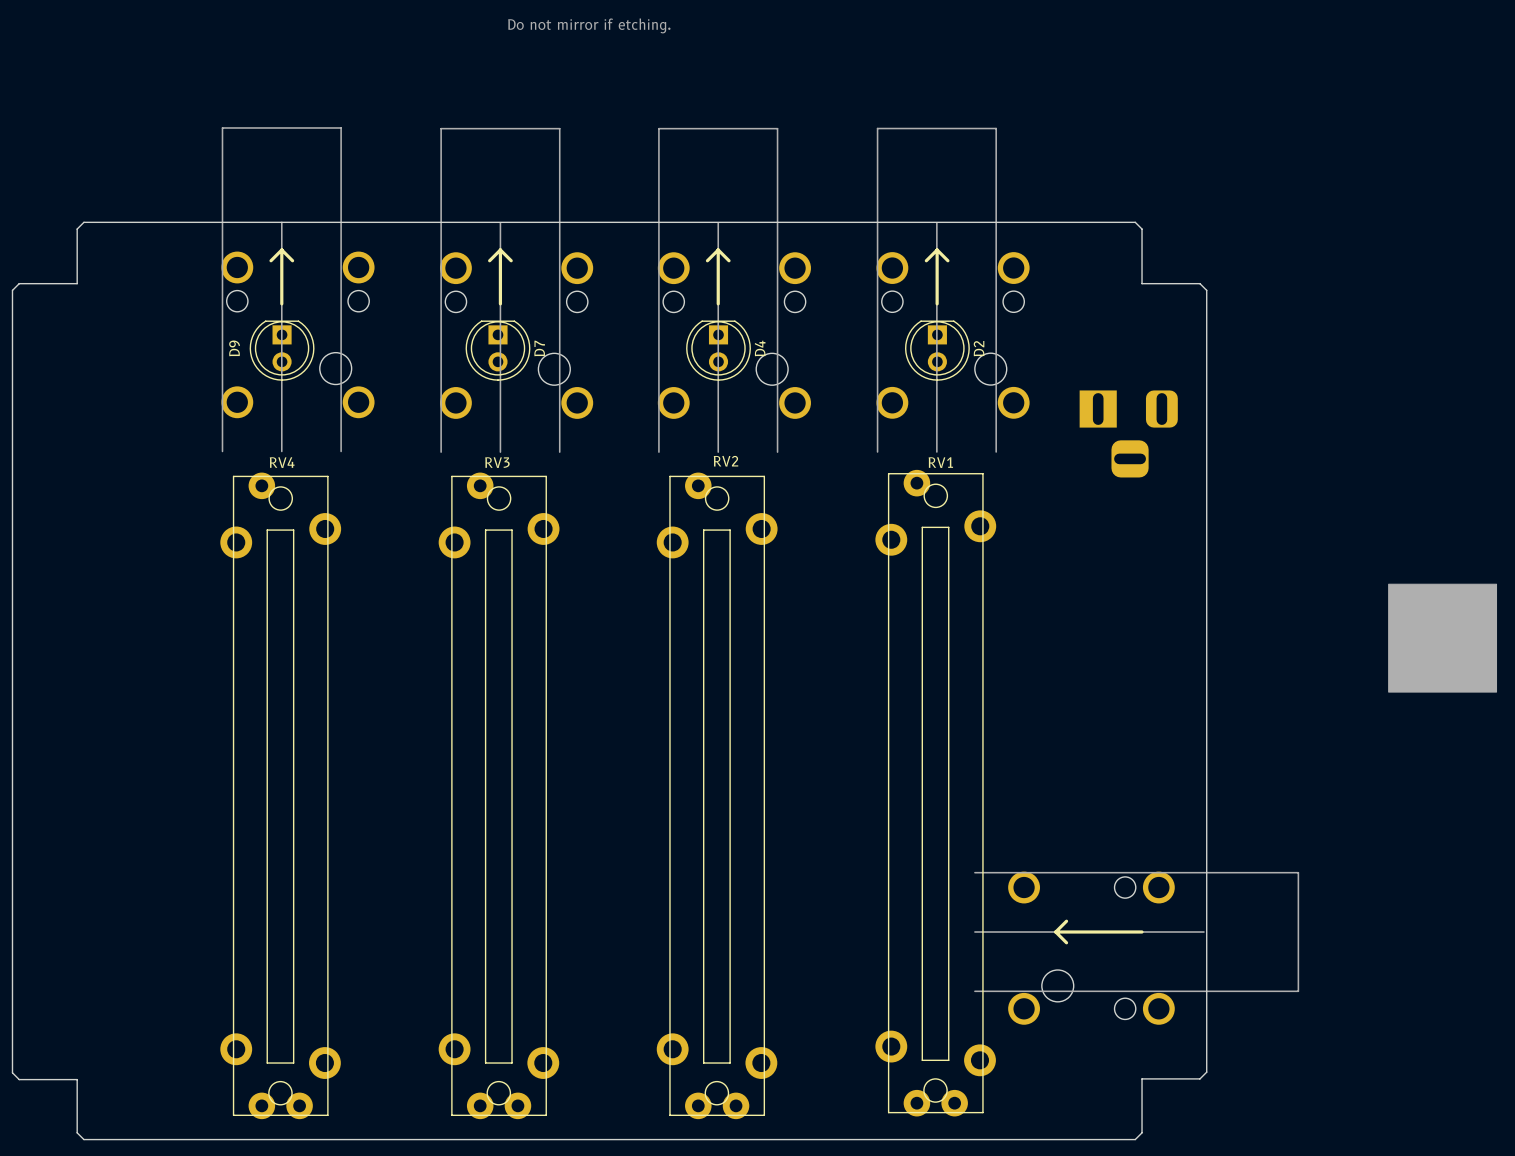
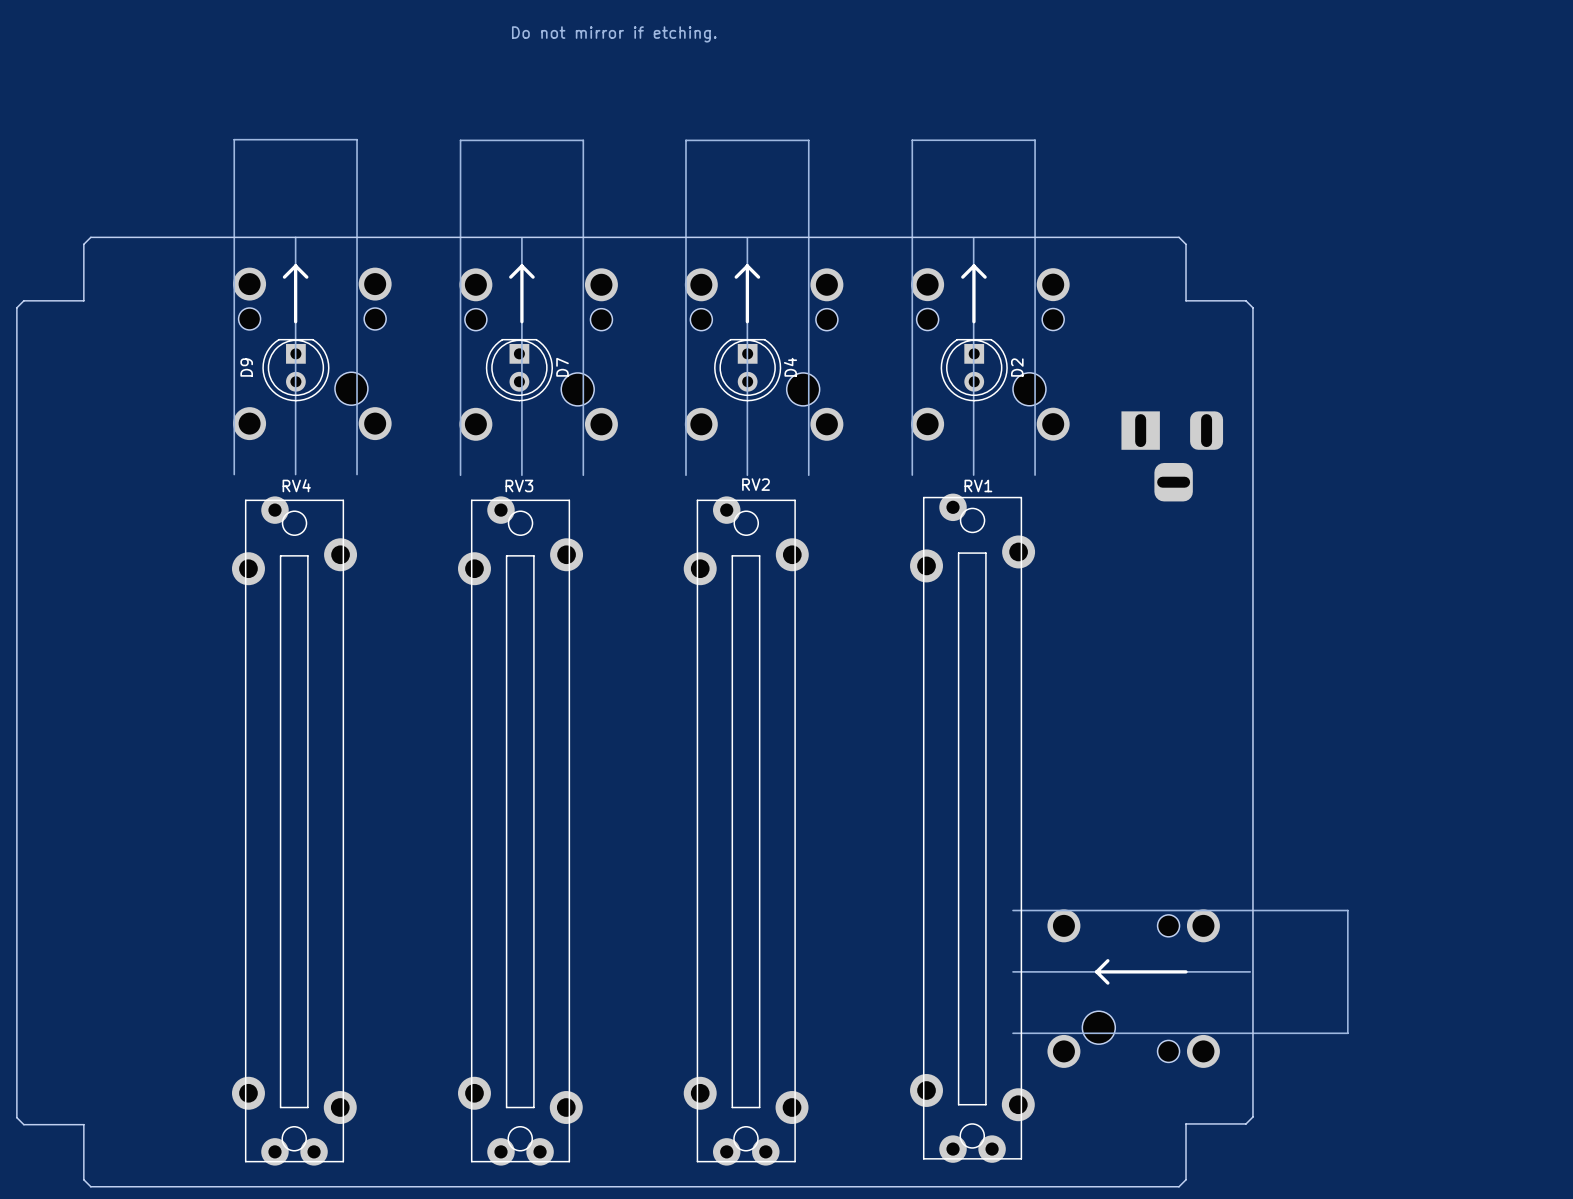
drawing: [1388, 583, 1498, 693] -> none

